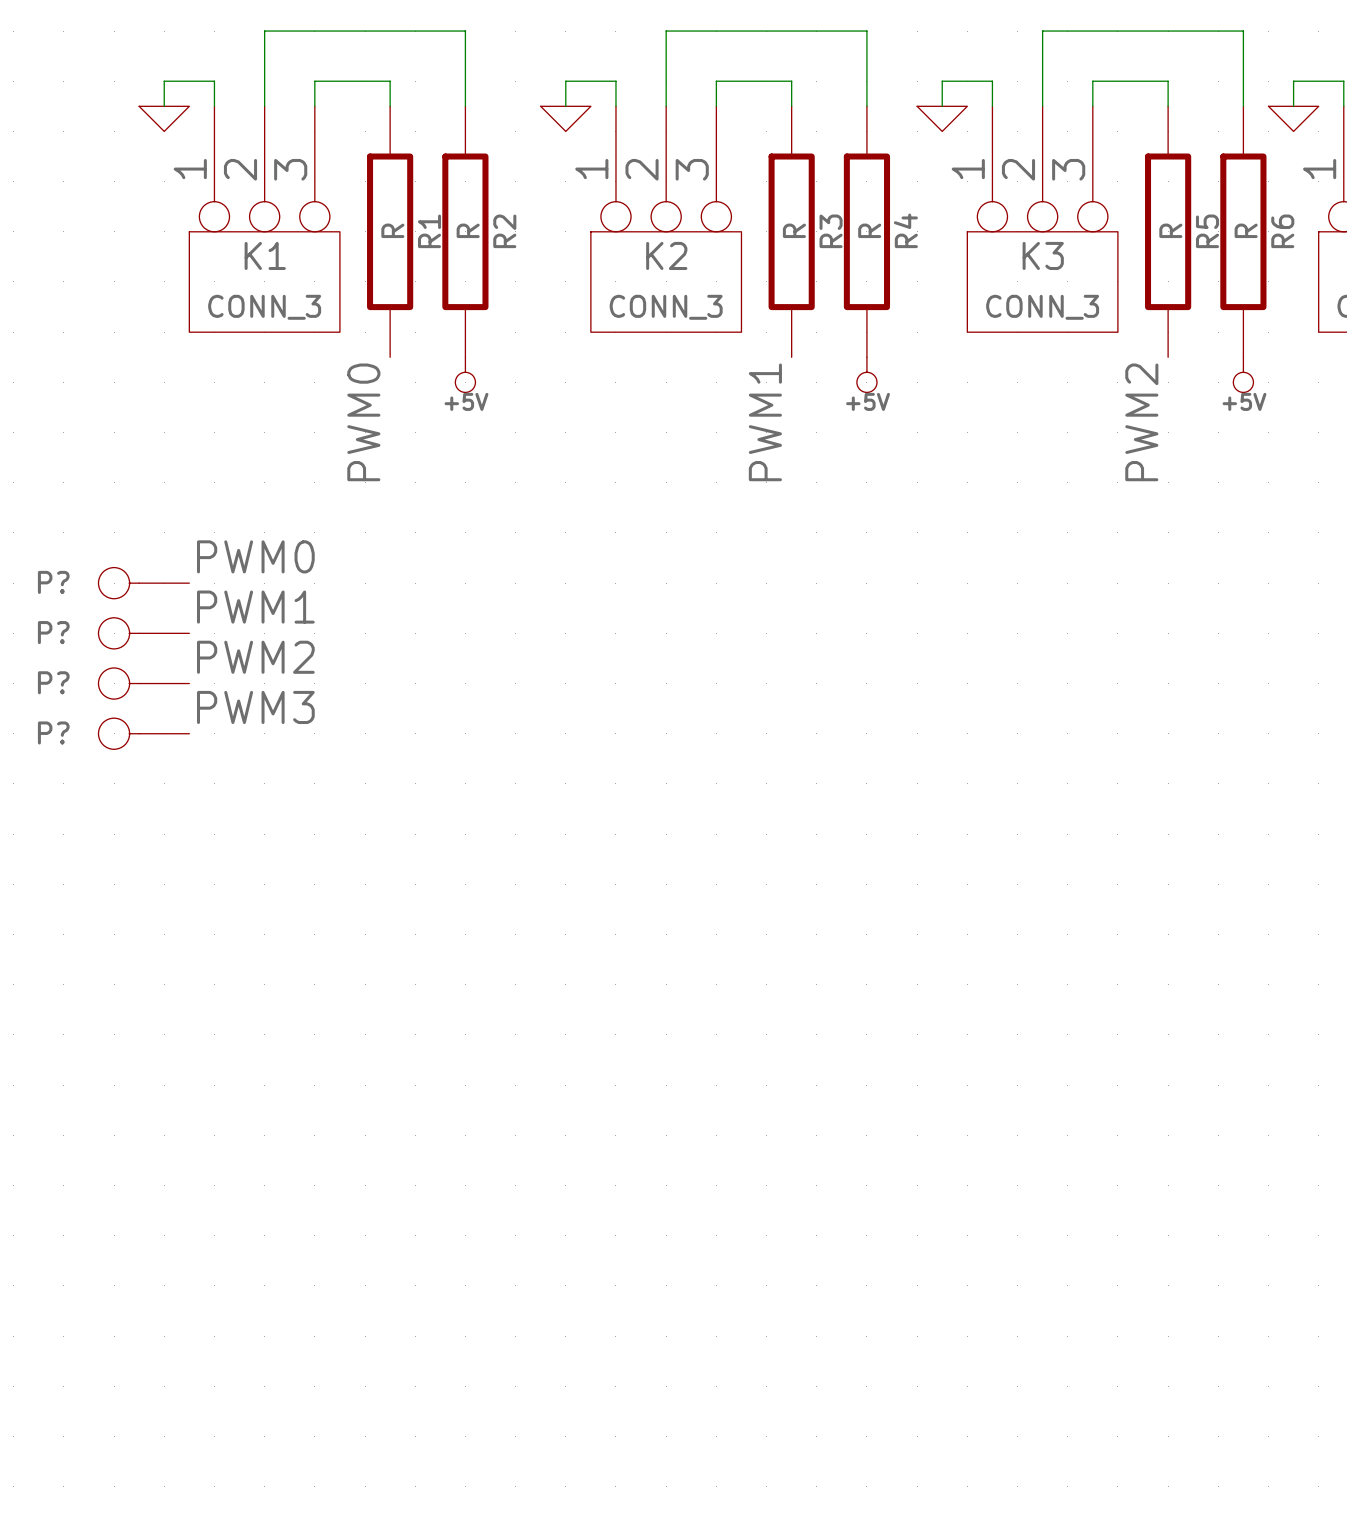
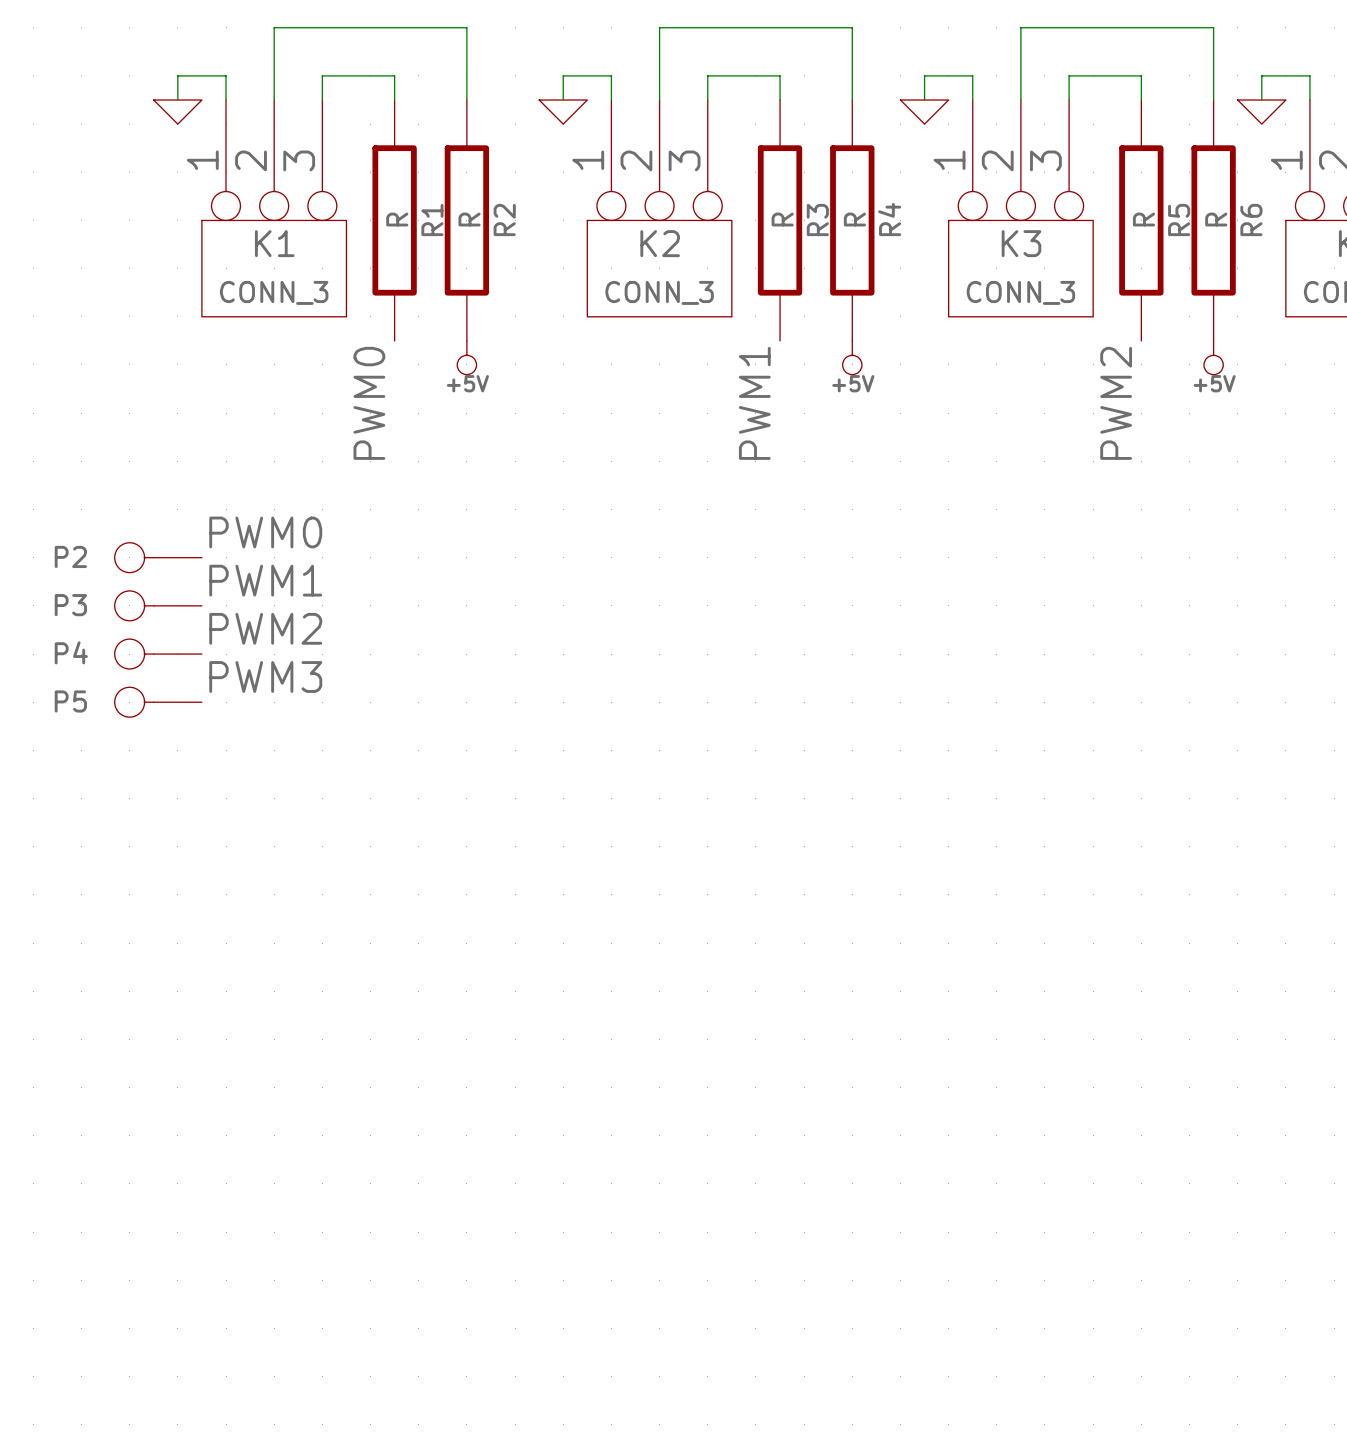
P? name: P? (53, 582) -> P2 (70, 556)
P? name: P? (53, 632) -> P3 (70, 605)
P? name: P? (53, 682) -> P4 (71, 652)
P? name: P? (53, 732) -> P5 (70, 701)

